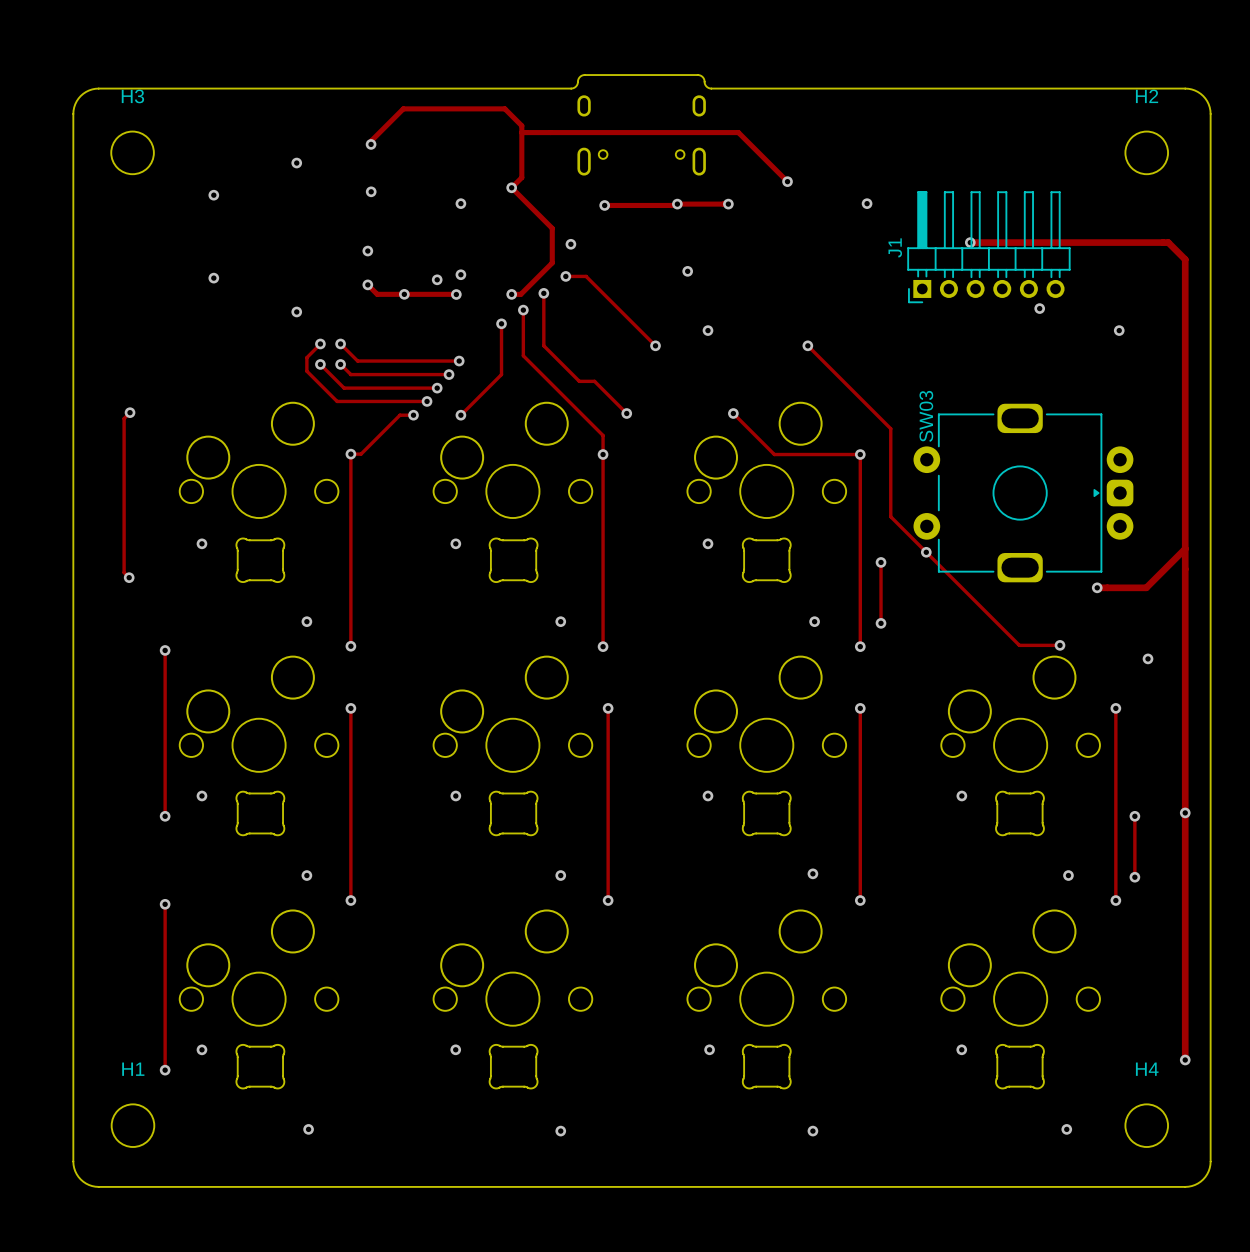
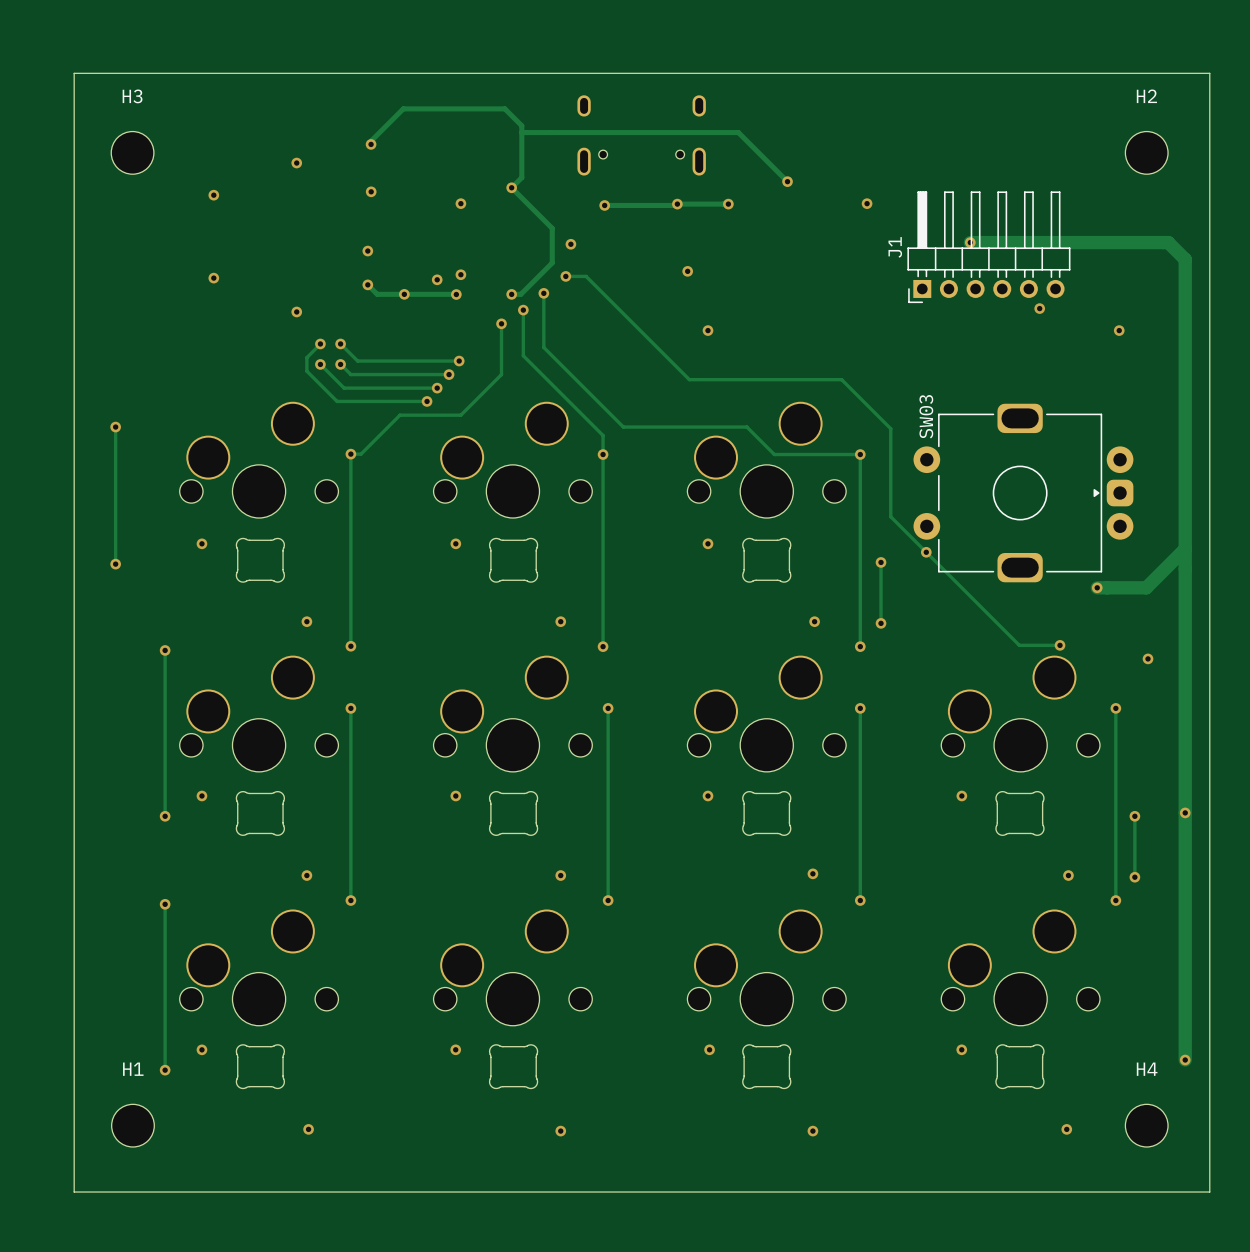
board edge: (584, 75) (698, 75) (703, 77) (706, 86) (711, 88) (1185, 88) (1197, 91) (1207, 101) (1210, 113) (1210, 1161) (1207, 1174) (1197, 1183) (1185, 1186) (98, 1186) (86, 1183) (76, 1174) (73, 1161) (73, 113) (75, 104) (86, 91) (98, 88) (571, 88) (575, 86) (579, 77) (584, 75) -> (74, 73) (74, 1192) (1209, 1192) (1209, 73) (74, 73)
track width: thin (970, 242) (1168, 242) (1185, 259) (1185, 1060) -> thick (970, 242) (1168, 242) (1185, 259) (1185, 1060)
track: (543, 345) (579, 381) (594, 381) (626, 413) -> (543, 345) (623, 427) (746, 427)
via: (655, 345) -> none
track: (807, 345) (841, 379) -> (655, 345) (689, 379) (841, 379)
via: (807, 345) -> none
track: (130, 412) (124, 418) (124, 572) (129, 577) -> none
via position: (130, 412) -> (115, 427)
via: (626, 413) -> none
track: (733, 413) (746, 427) -> none
via: (733, 413) -> none
track: none -> (413, 415) (460, 415)
via: (413, 415) -> none
via: (460, 415) -> none
track: none -> (115, 427) (115, 564)
track width: thin (1185, 548) (1146, 587) (1097, 587) -> thick (1185, 548) (1146, 587) (1097, 587)
via position: (129, 577) -> (115, 564)

